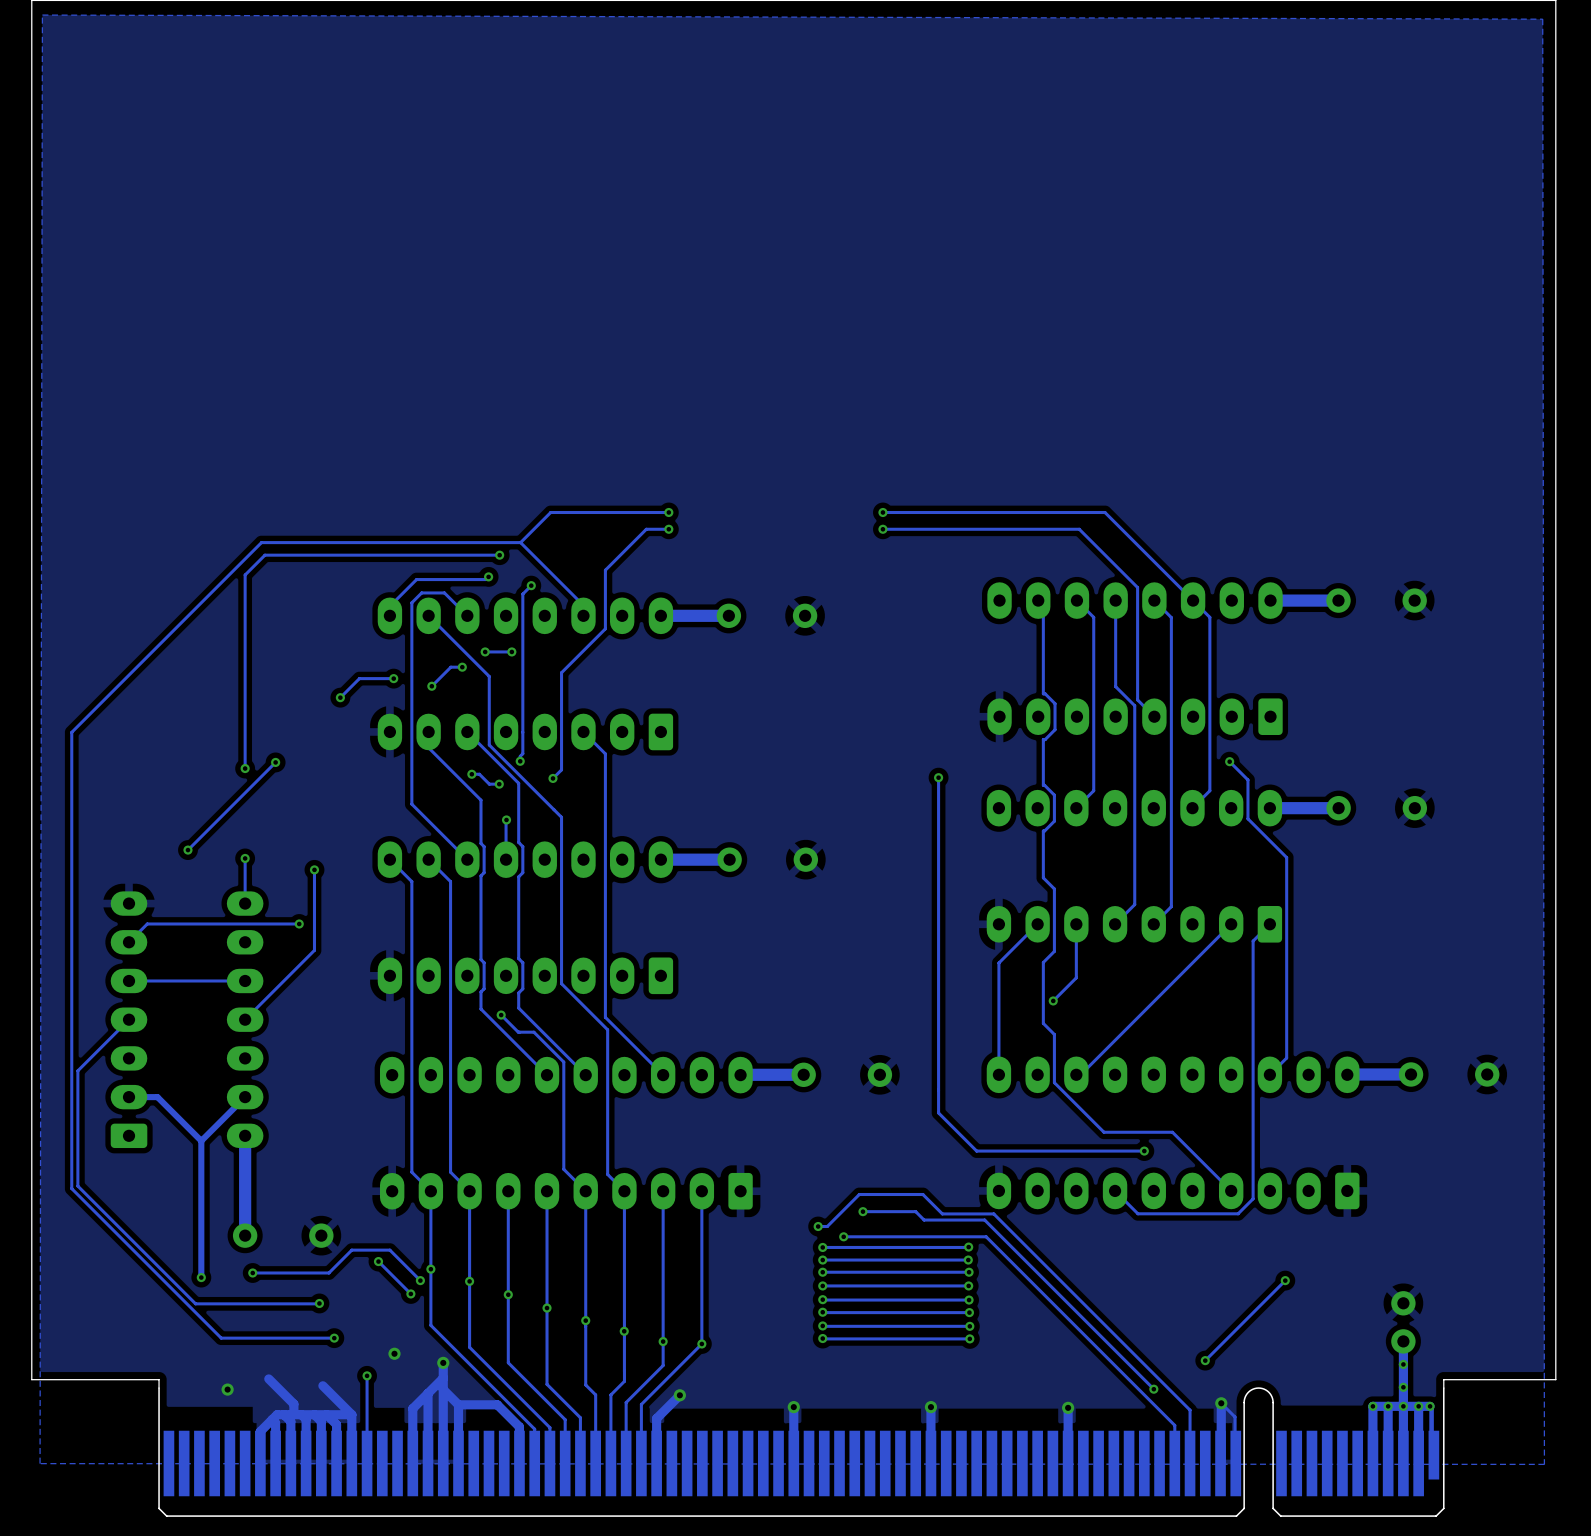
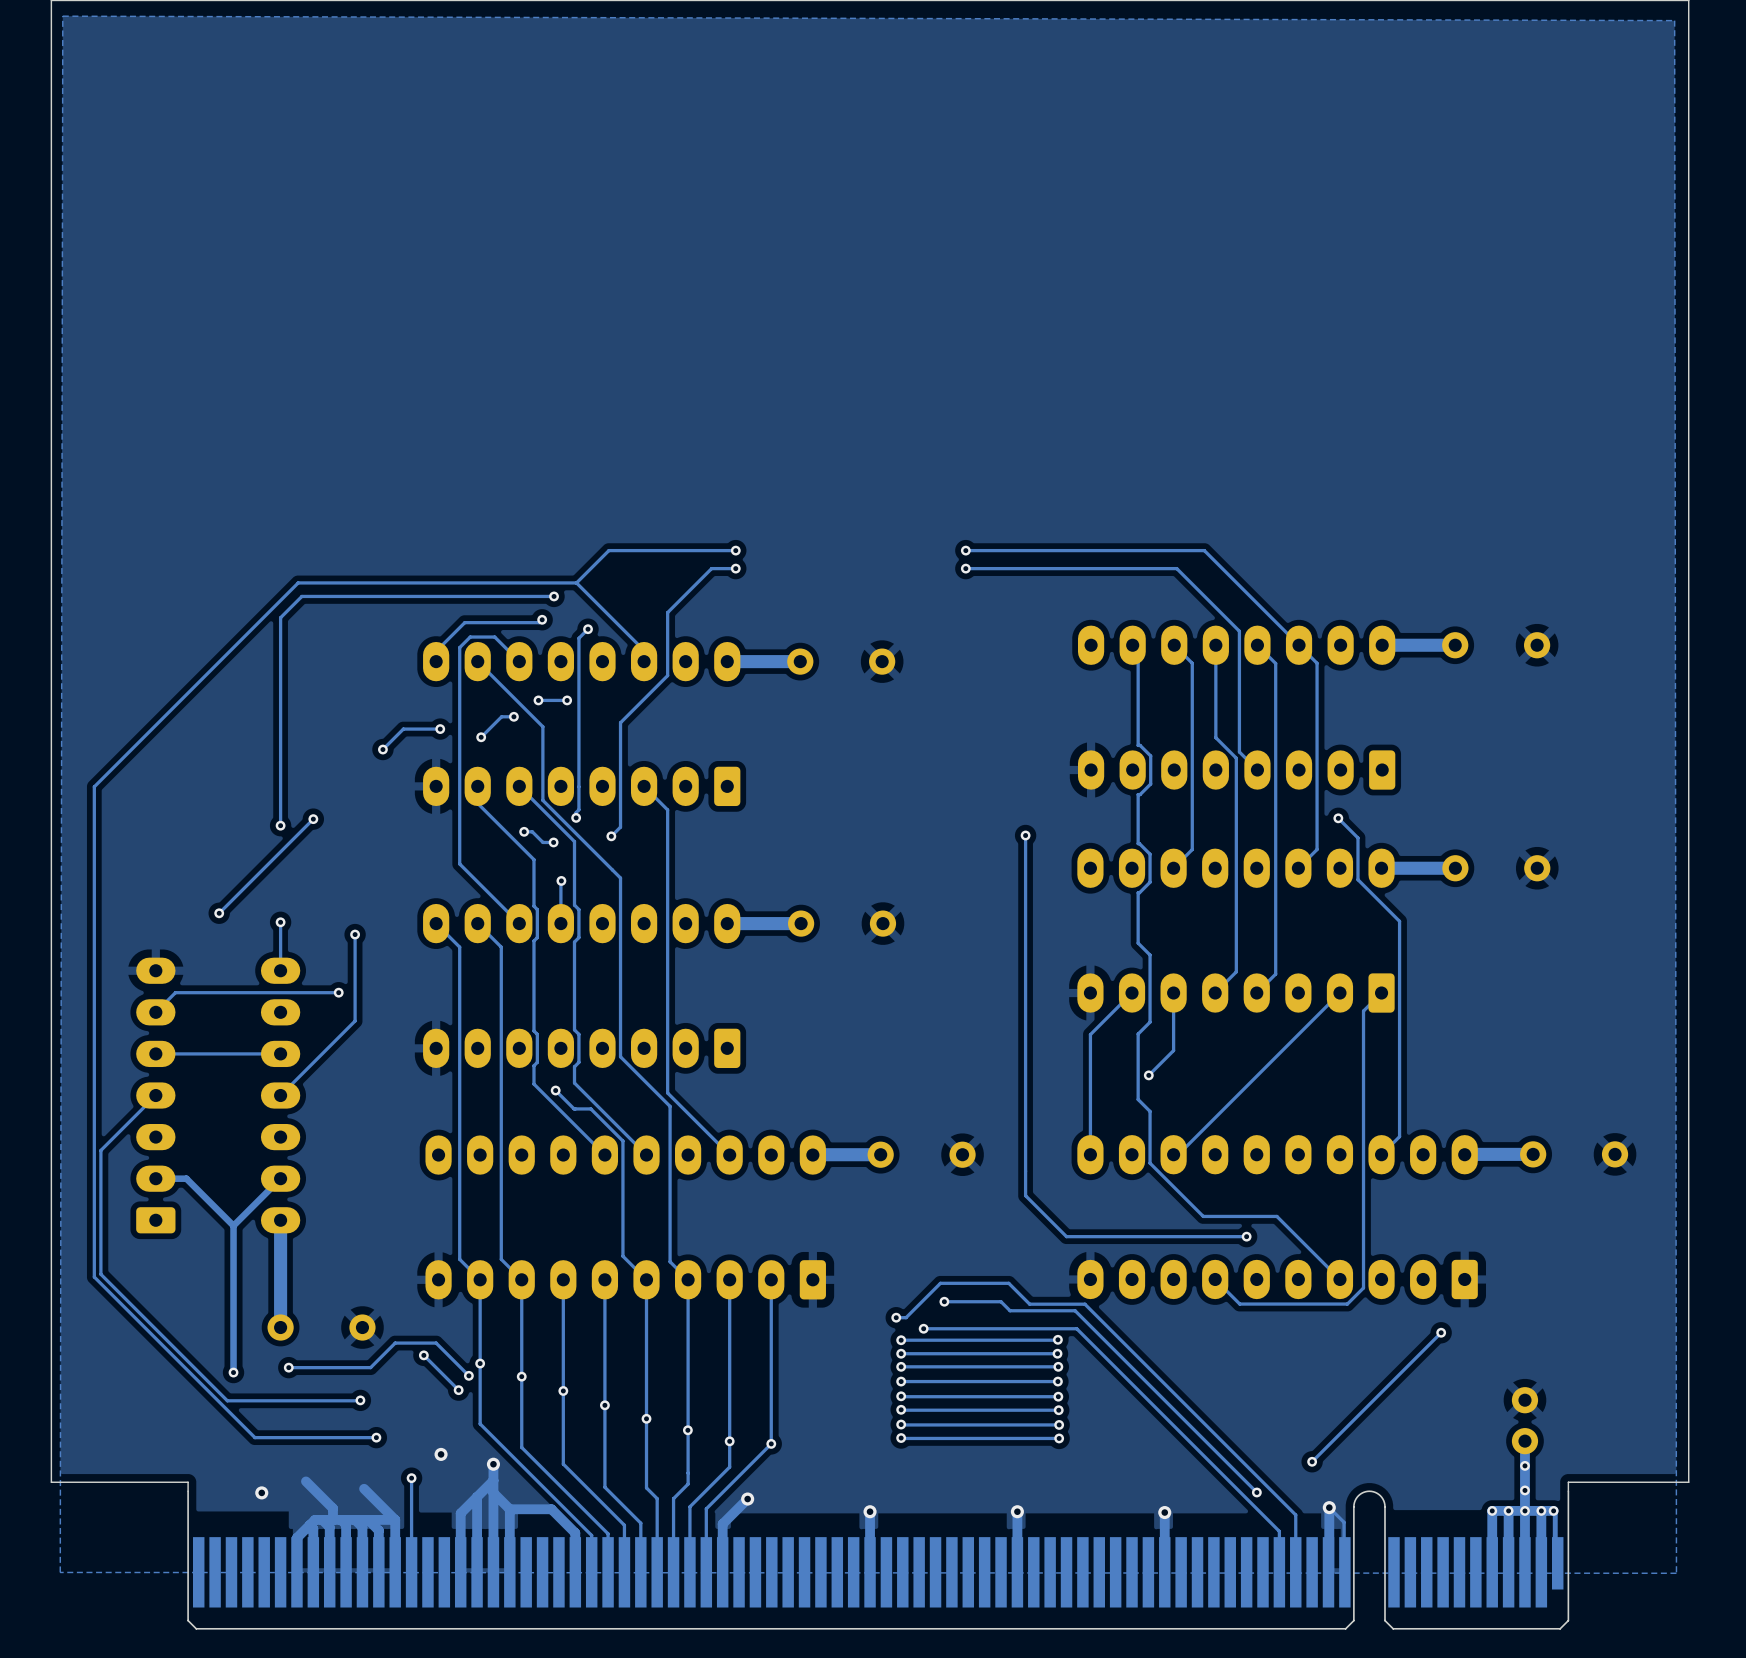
track: none -> (1441, 1332) (1398, 1375)
via position: (1285, 1280) -> (1441, 1332)

